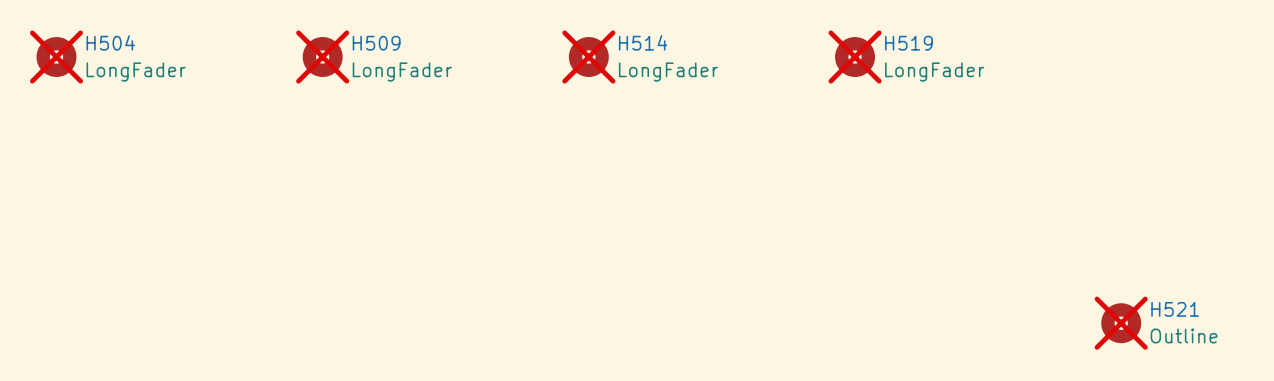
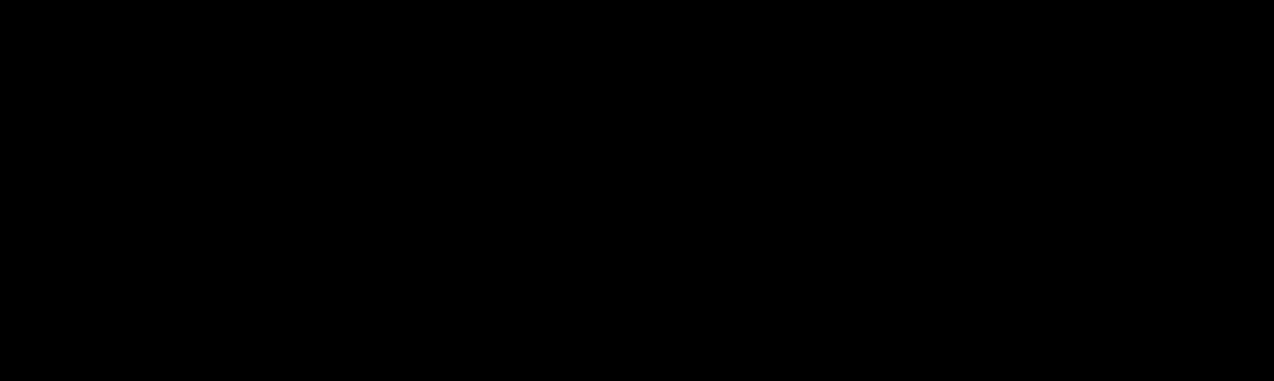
H504: LongFader (56, 57) -> none
H509: LongFader (322, 57) -> none
H514: LongFader (588, 57) -> none
H519: LongFader (855, 57) -> none
H521: Outline (1121, 323) -> none

